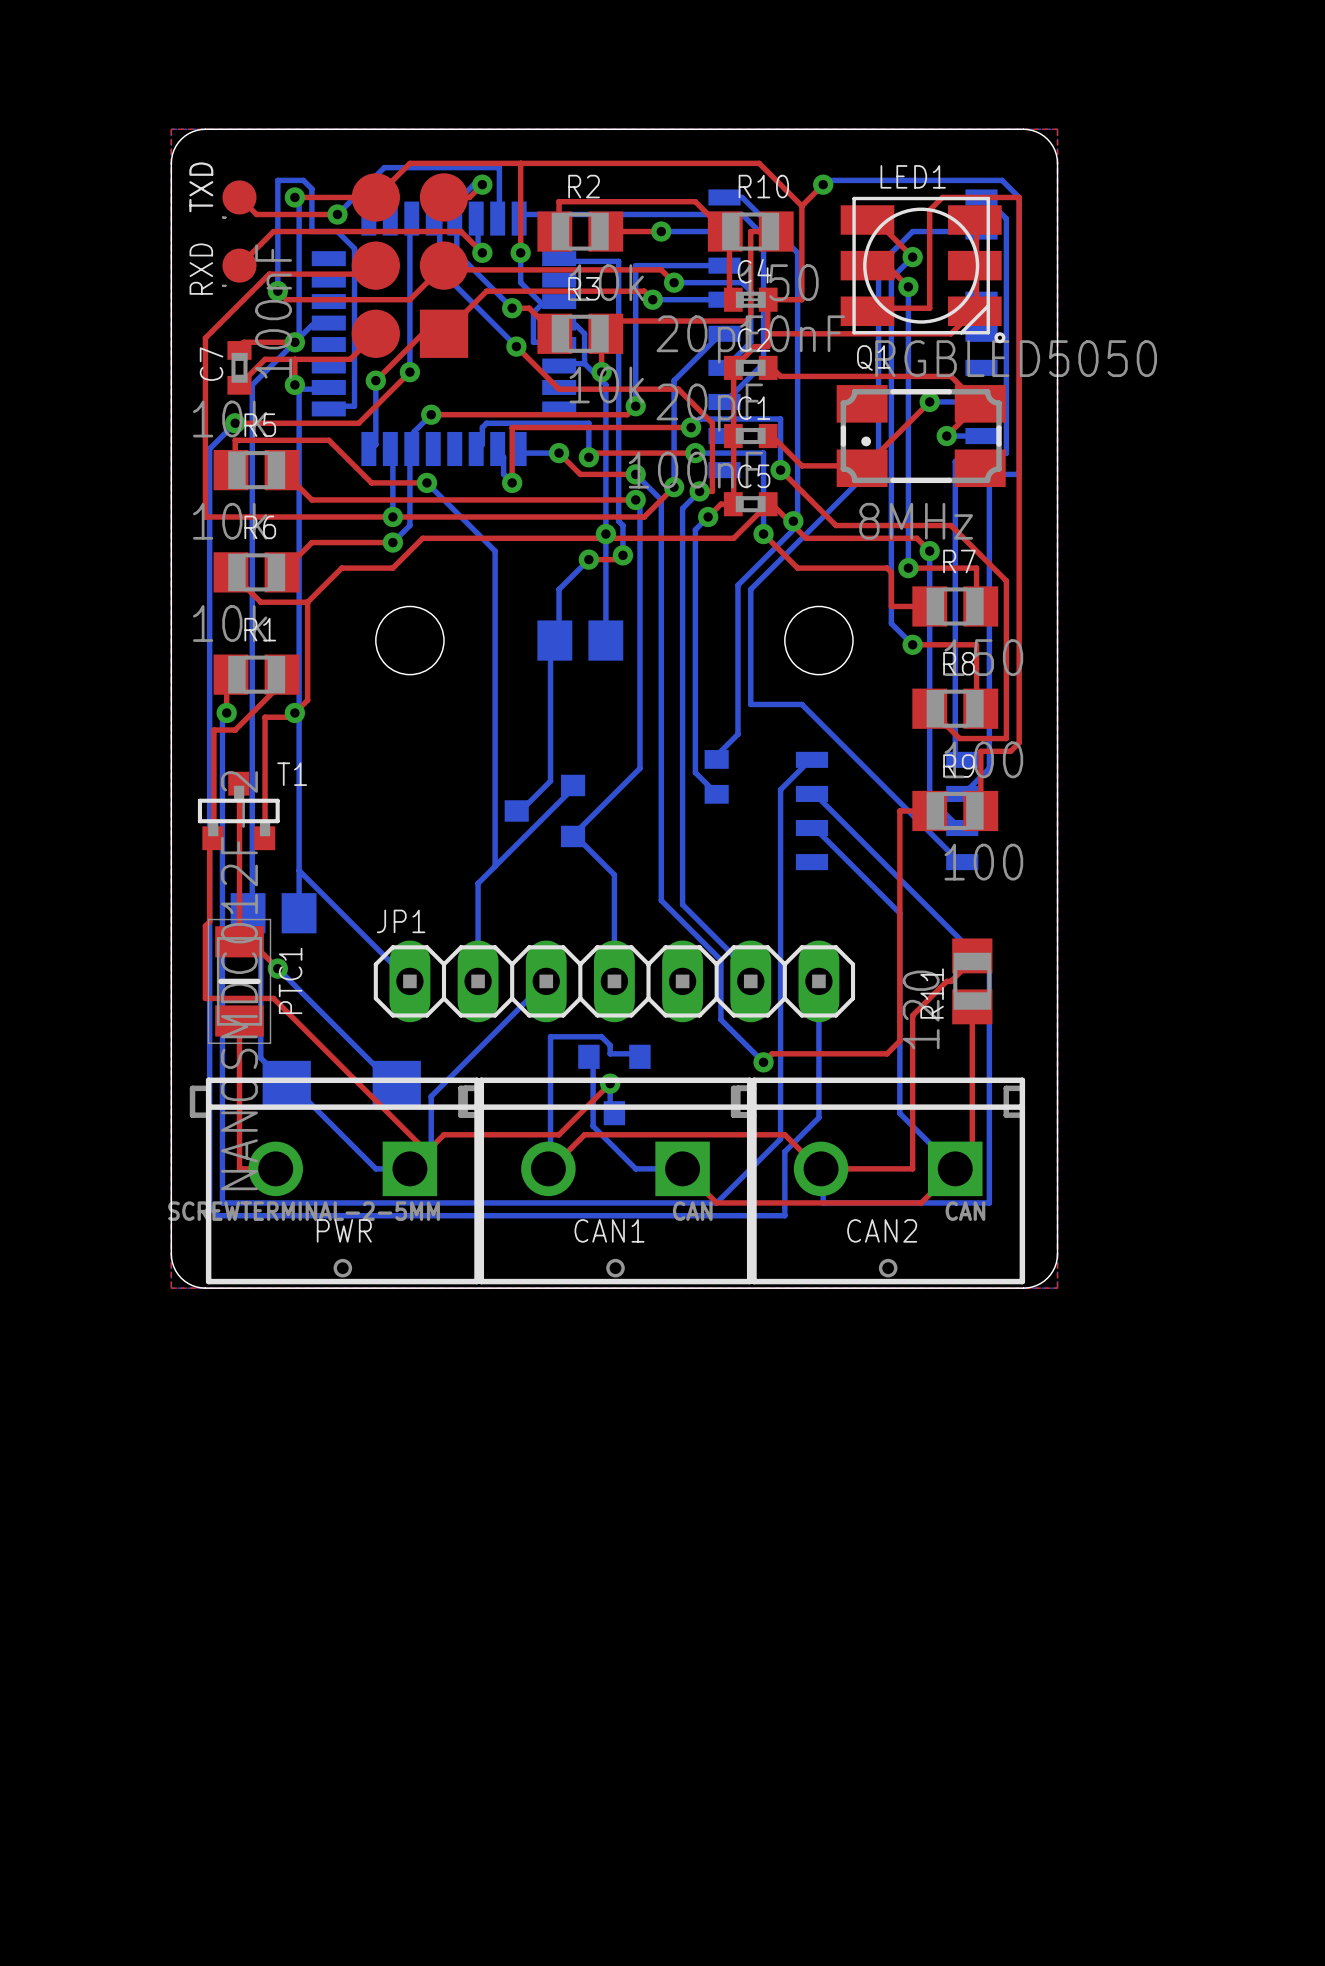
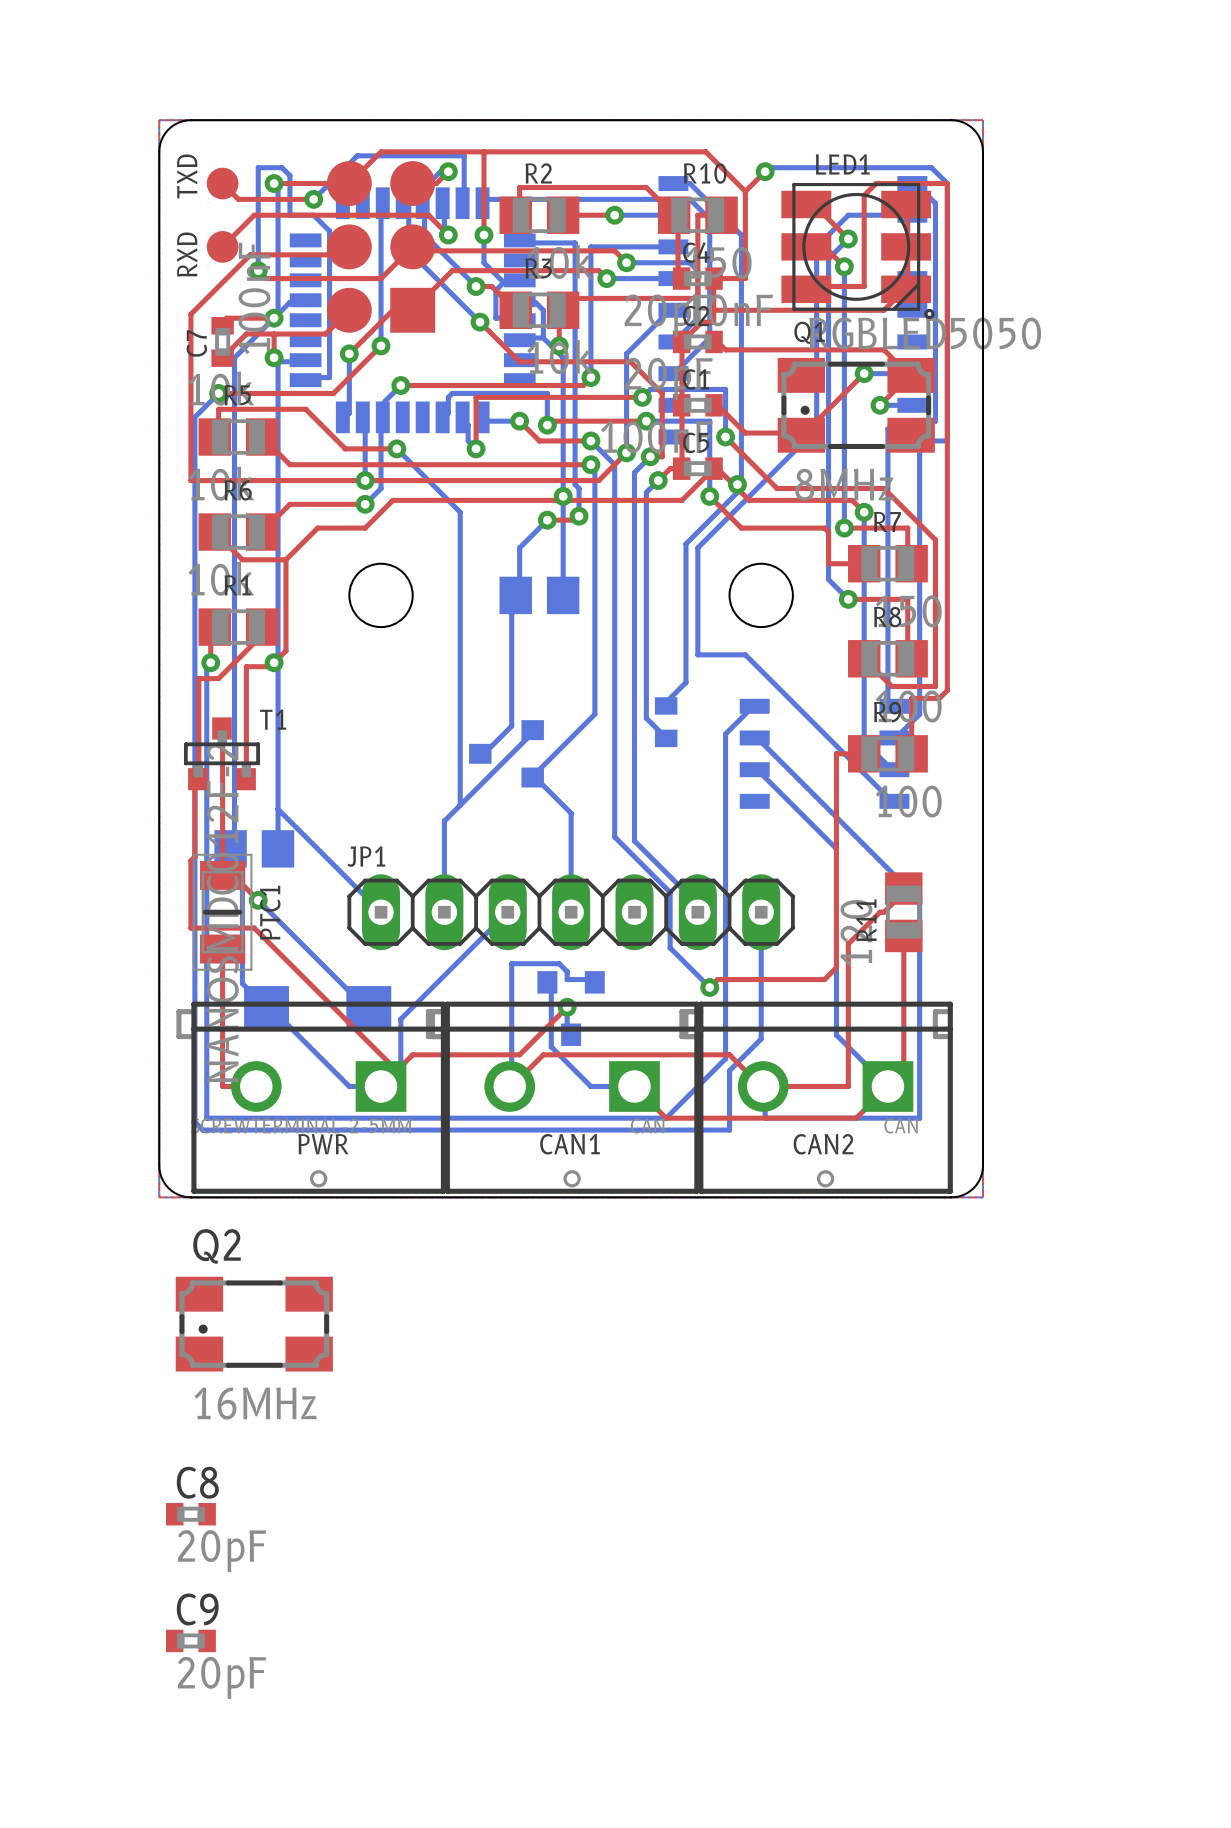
Q2: none -> 16MHz (254, 1324)
C8: none -> 20pF (190, 1514)
C9: none -> 20pF (190, 1640)

